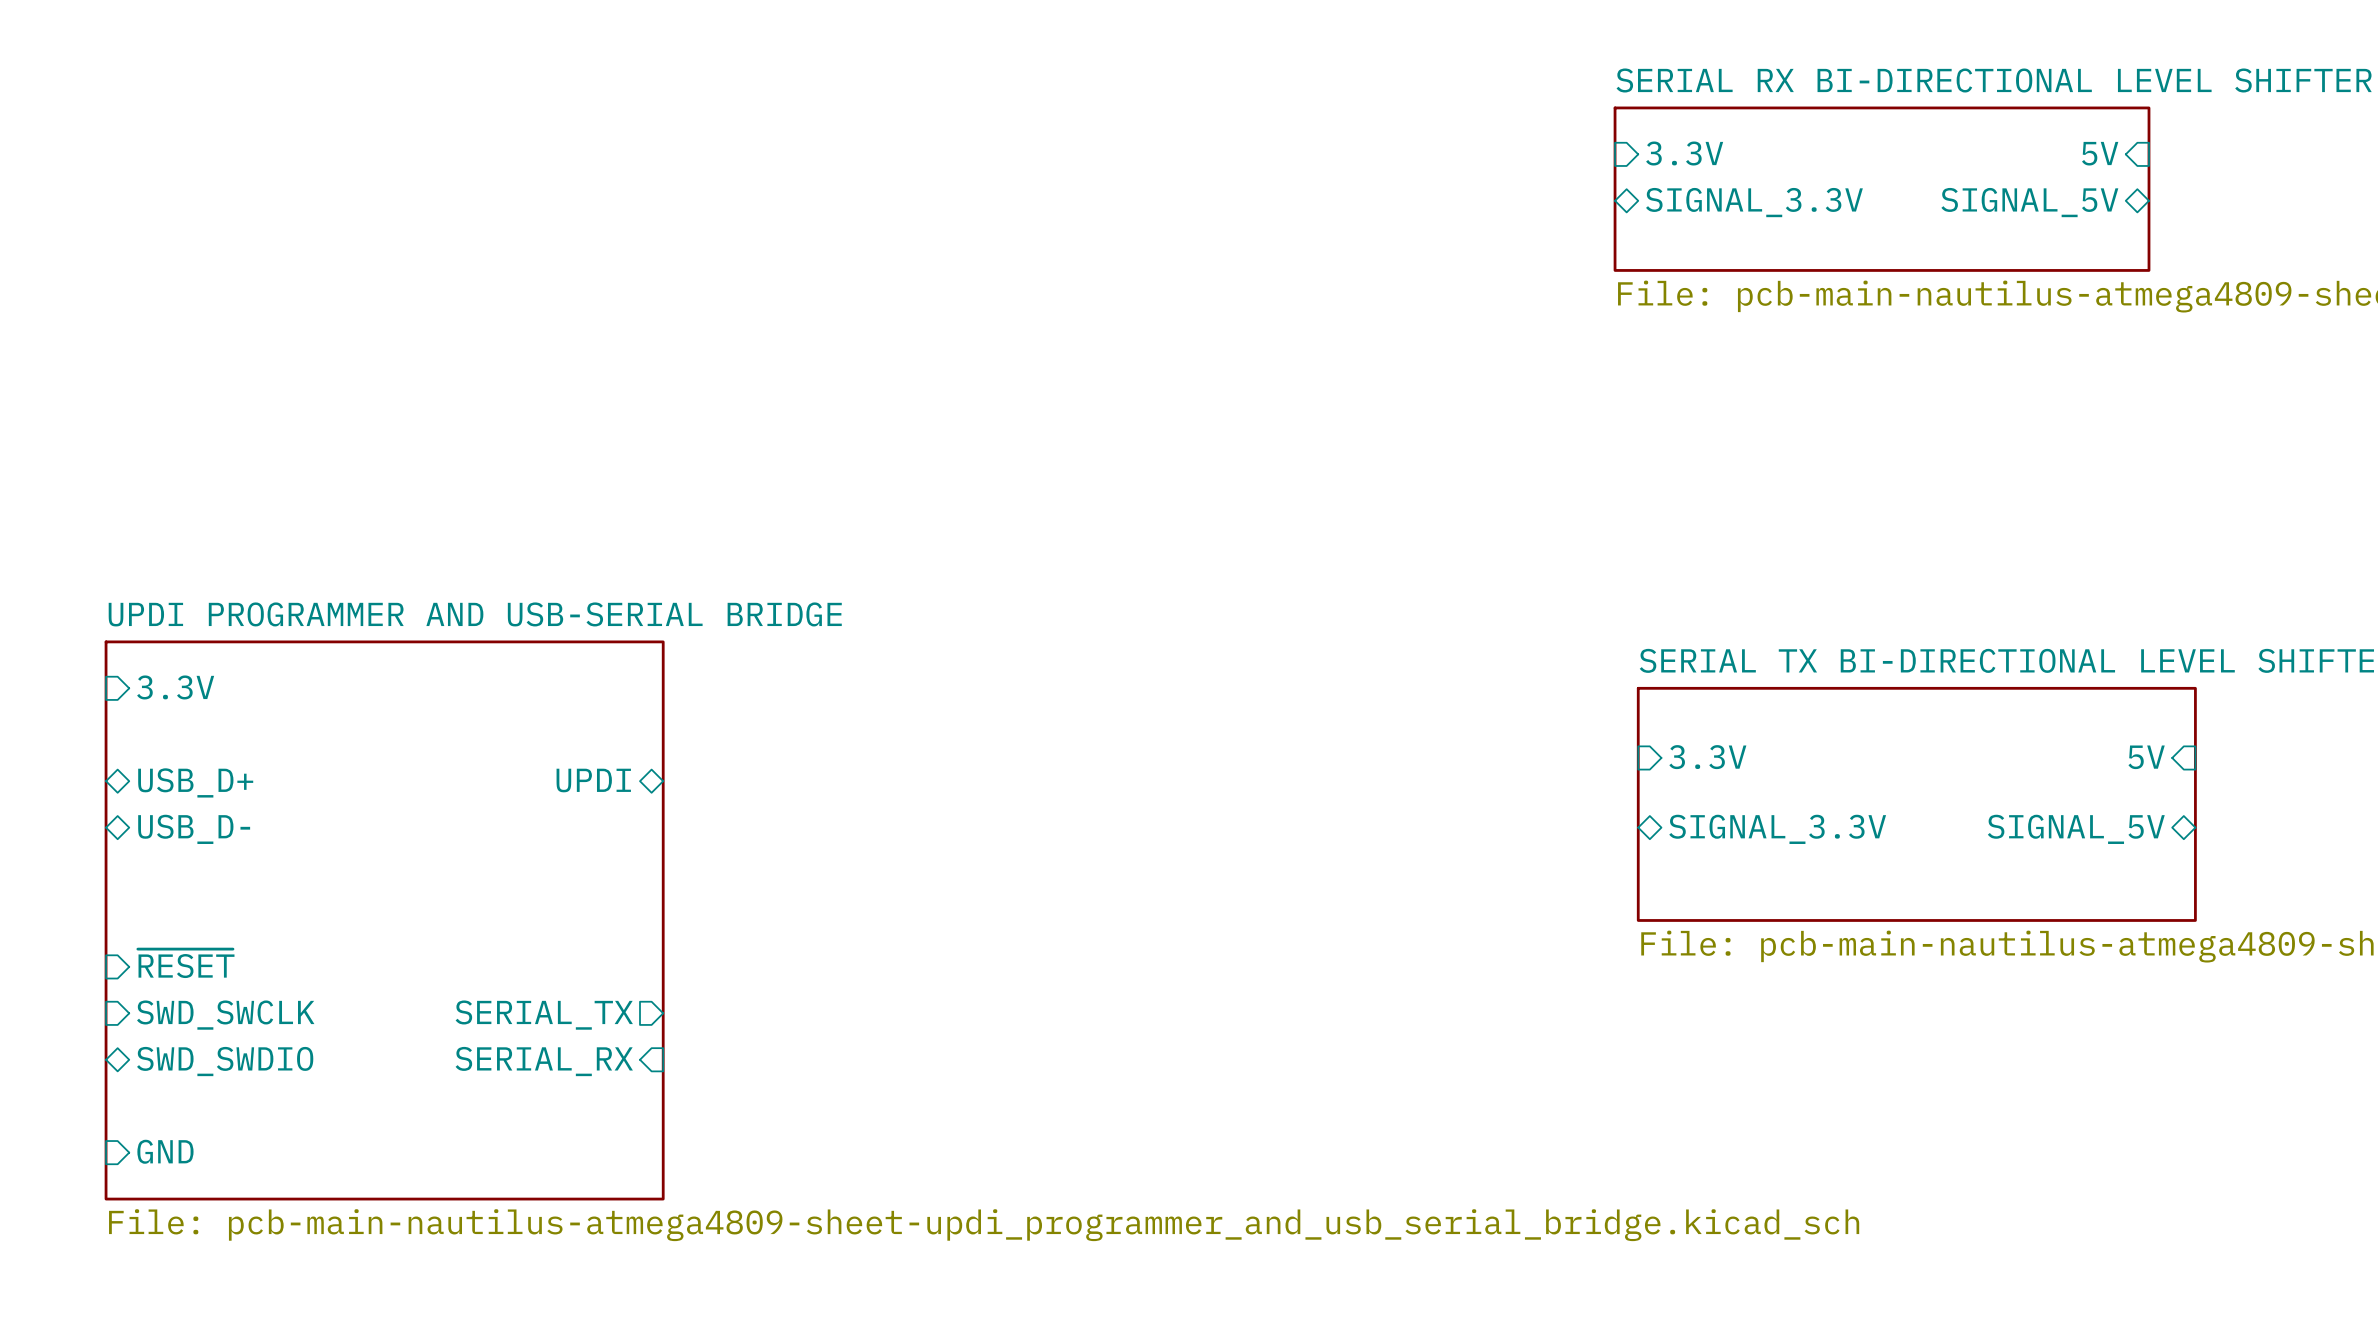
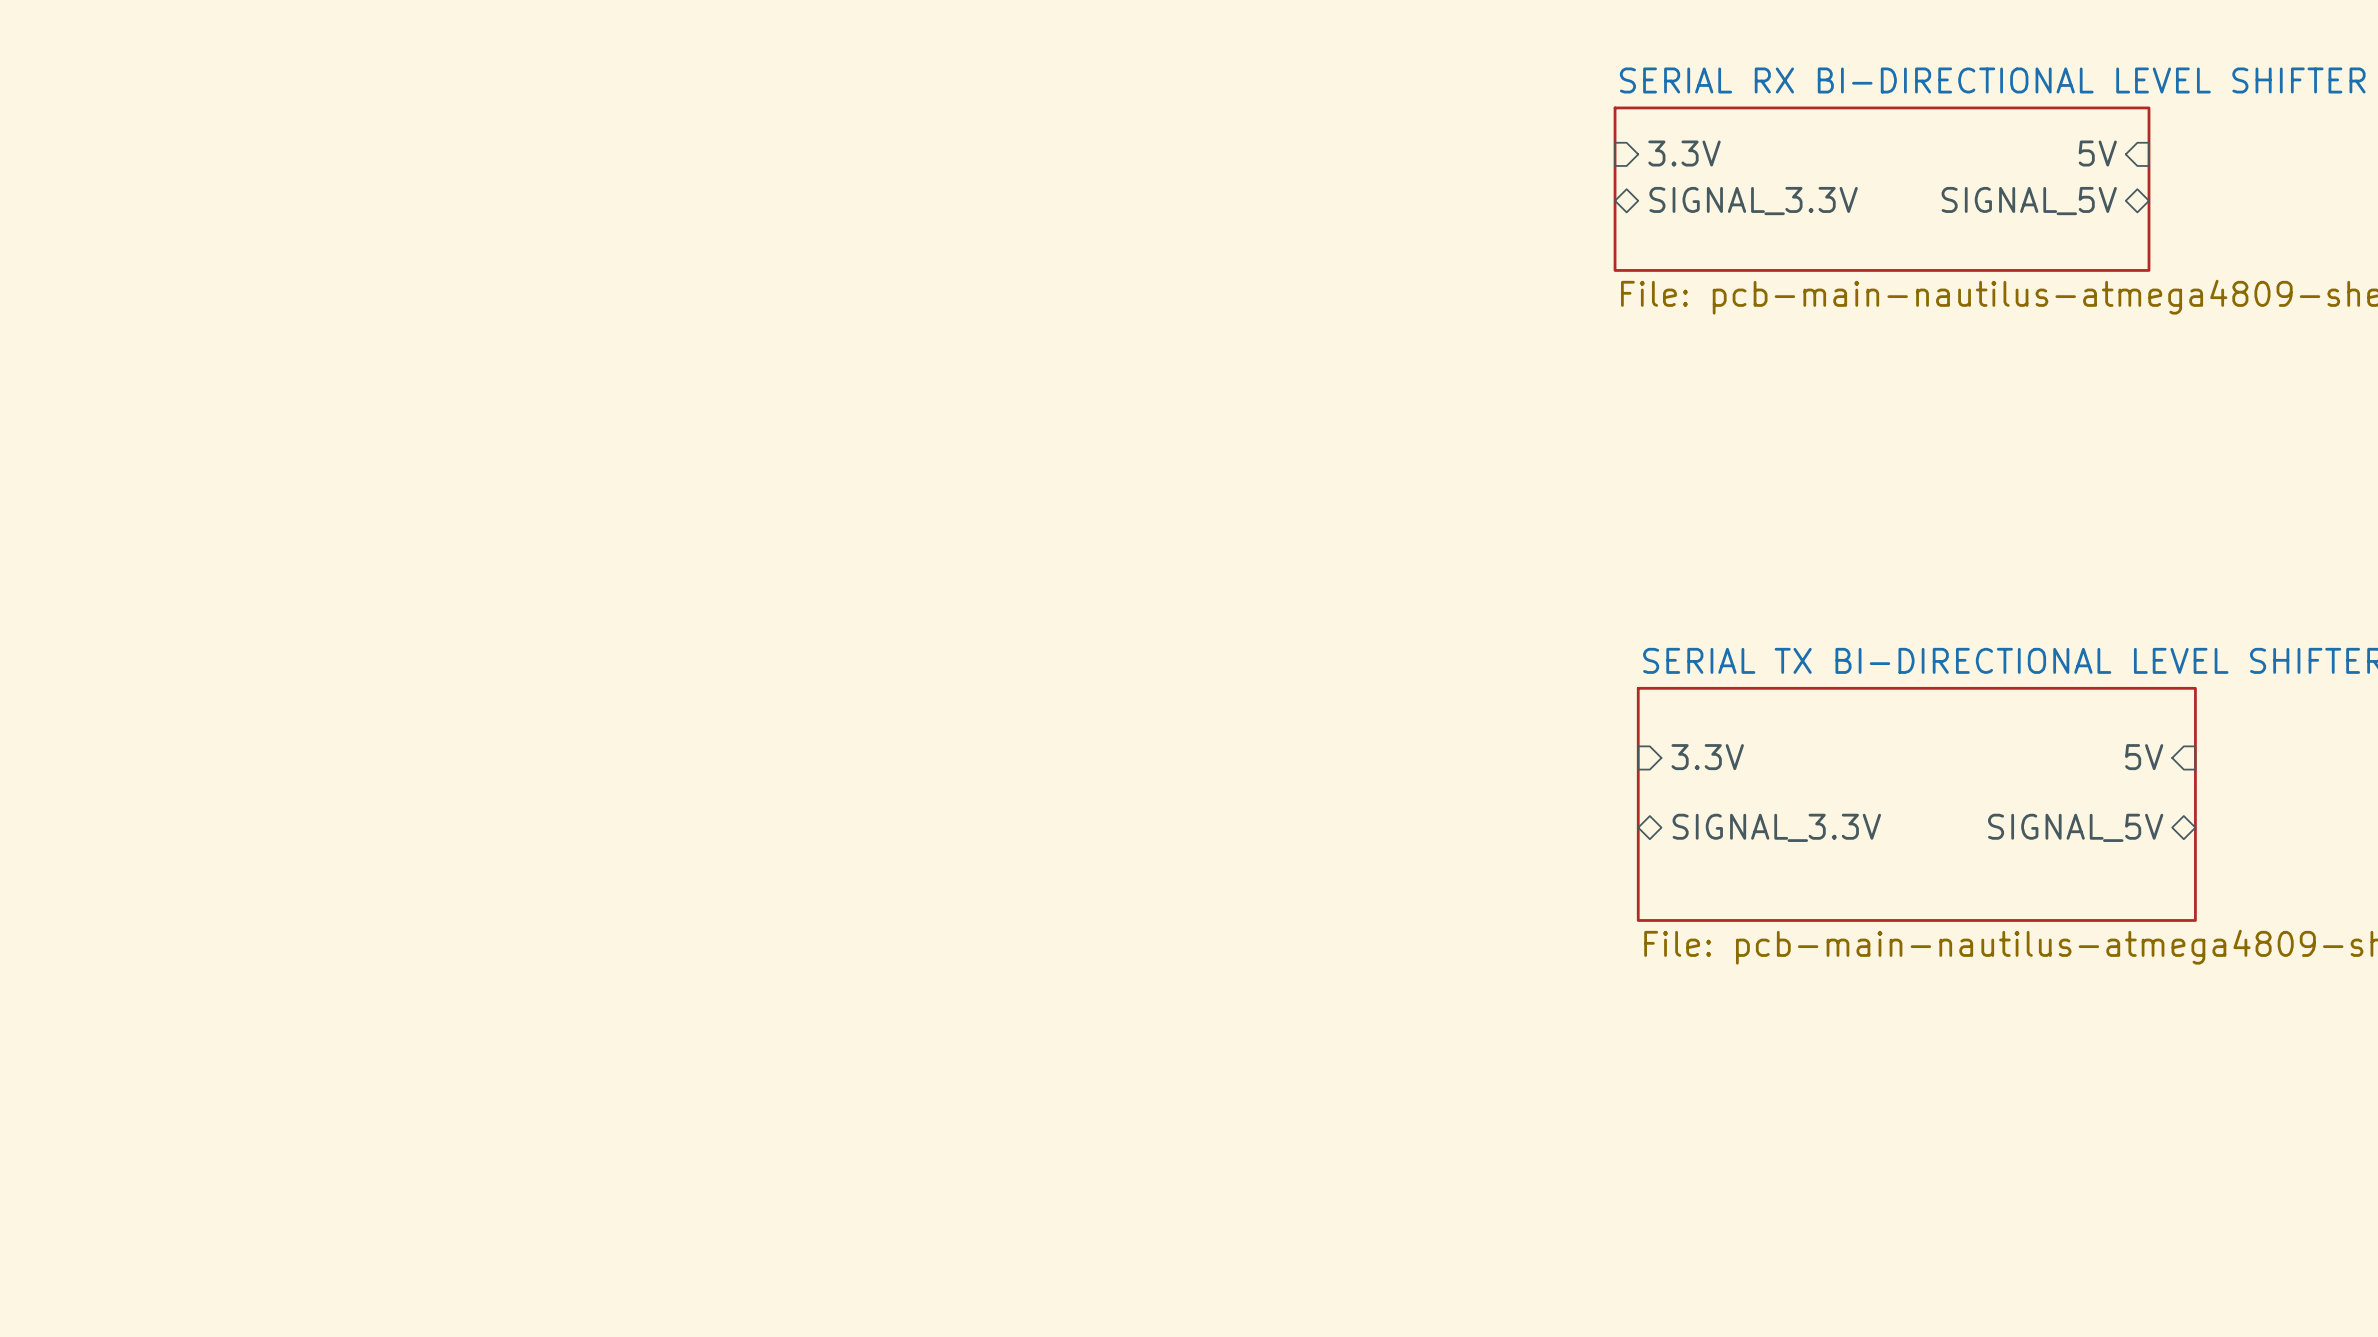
sheet pin: 3.3V (175, 687) -> none
sheet pin: UPDI (593, 780) -> none
sheet pin: USB_D+ (195, 782) -> none
sheet pin: USB_D- (194, 829) -> none
sheet UPDI PROGRAMMER AND USB-SERIAL BRIDGE: File: pcb-main-nautilus-atmega4809-sheet-updi_programmer_and_usb_serial_bridge.kicad_sch (384, 920) -> none
sheet pin: ~{RESET} (186, 963) -> none
sheet pin: SWD_SWCLK (225, 1015) -> none
sheet pin: SERIAL_TX (544, 1015) -> none
sheet pin: SWD_SWDIO (225, 1061) -> none
sheet pin: SERIAL_RX (544, 1061) -> none
sheet pin: GND (165, 1151) -> none

